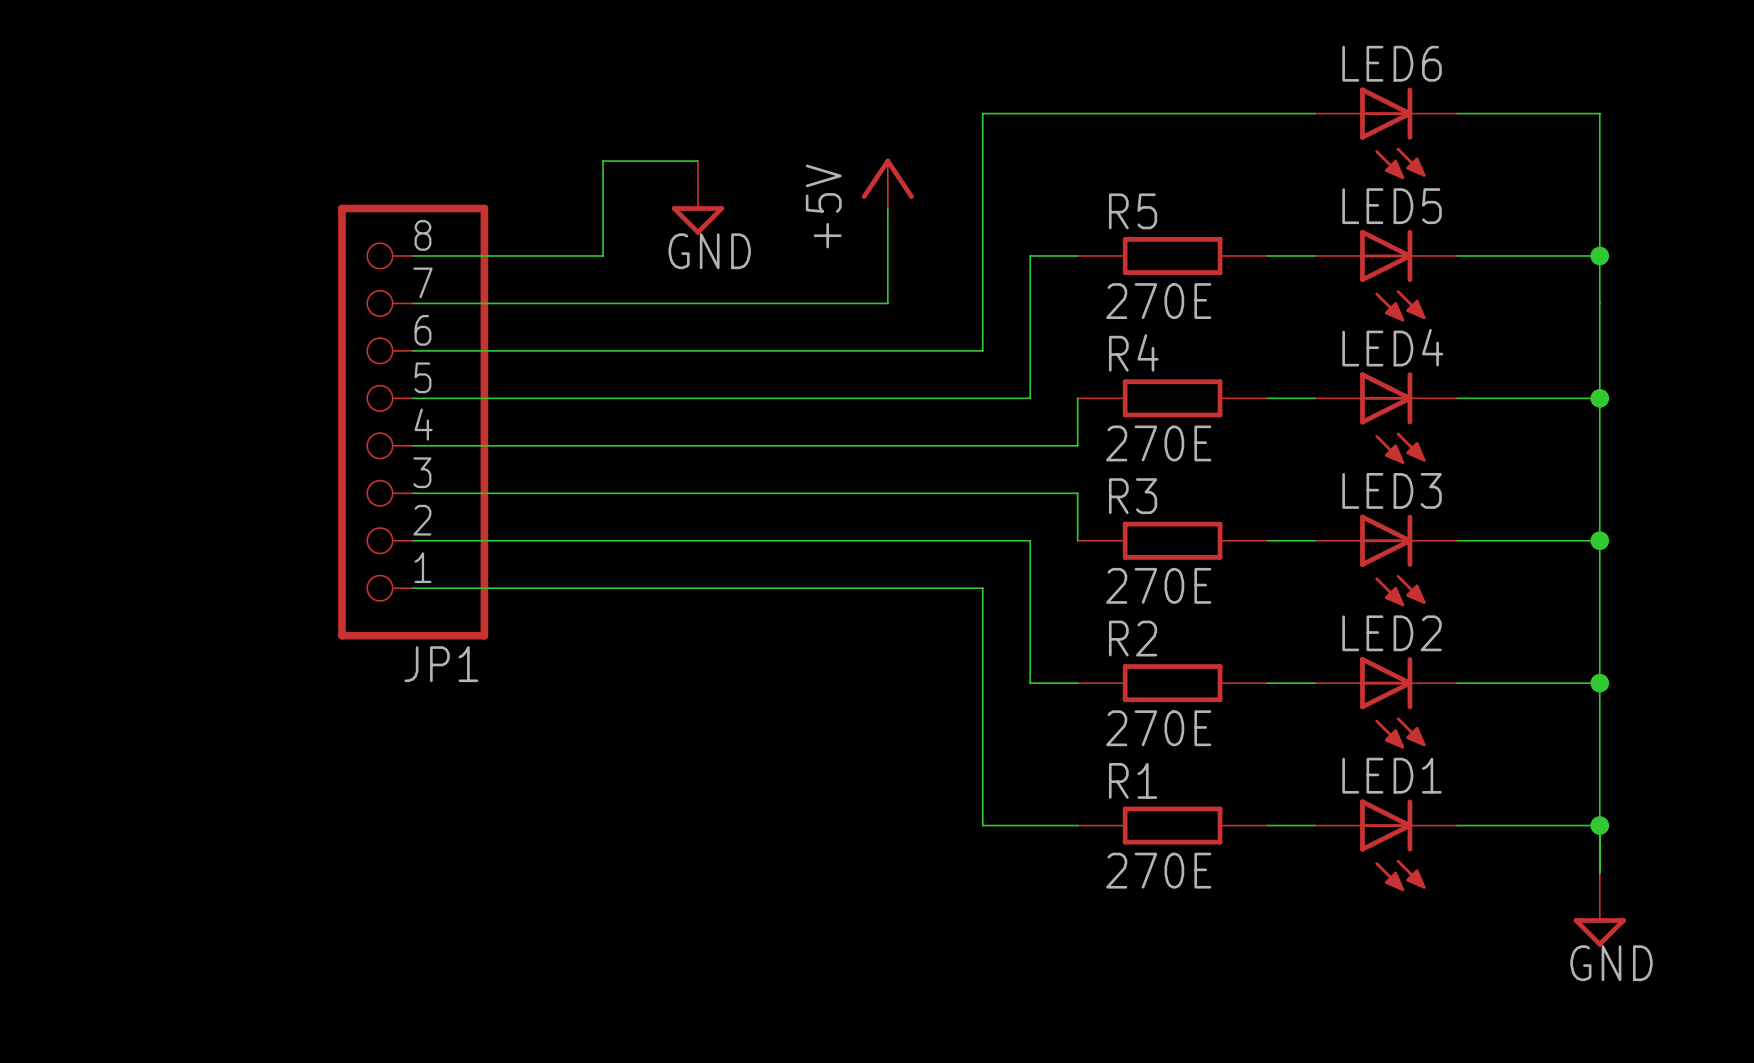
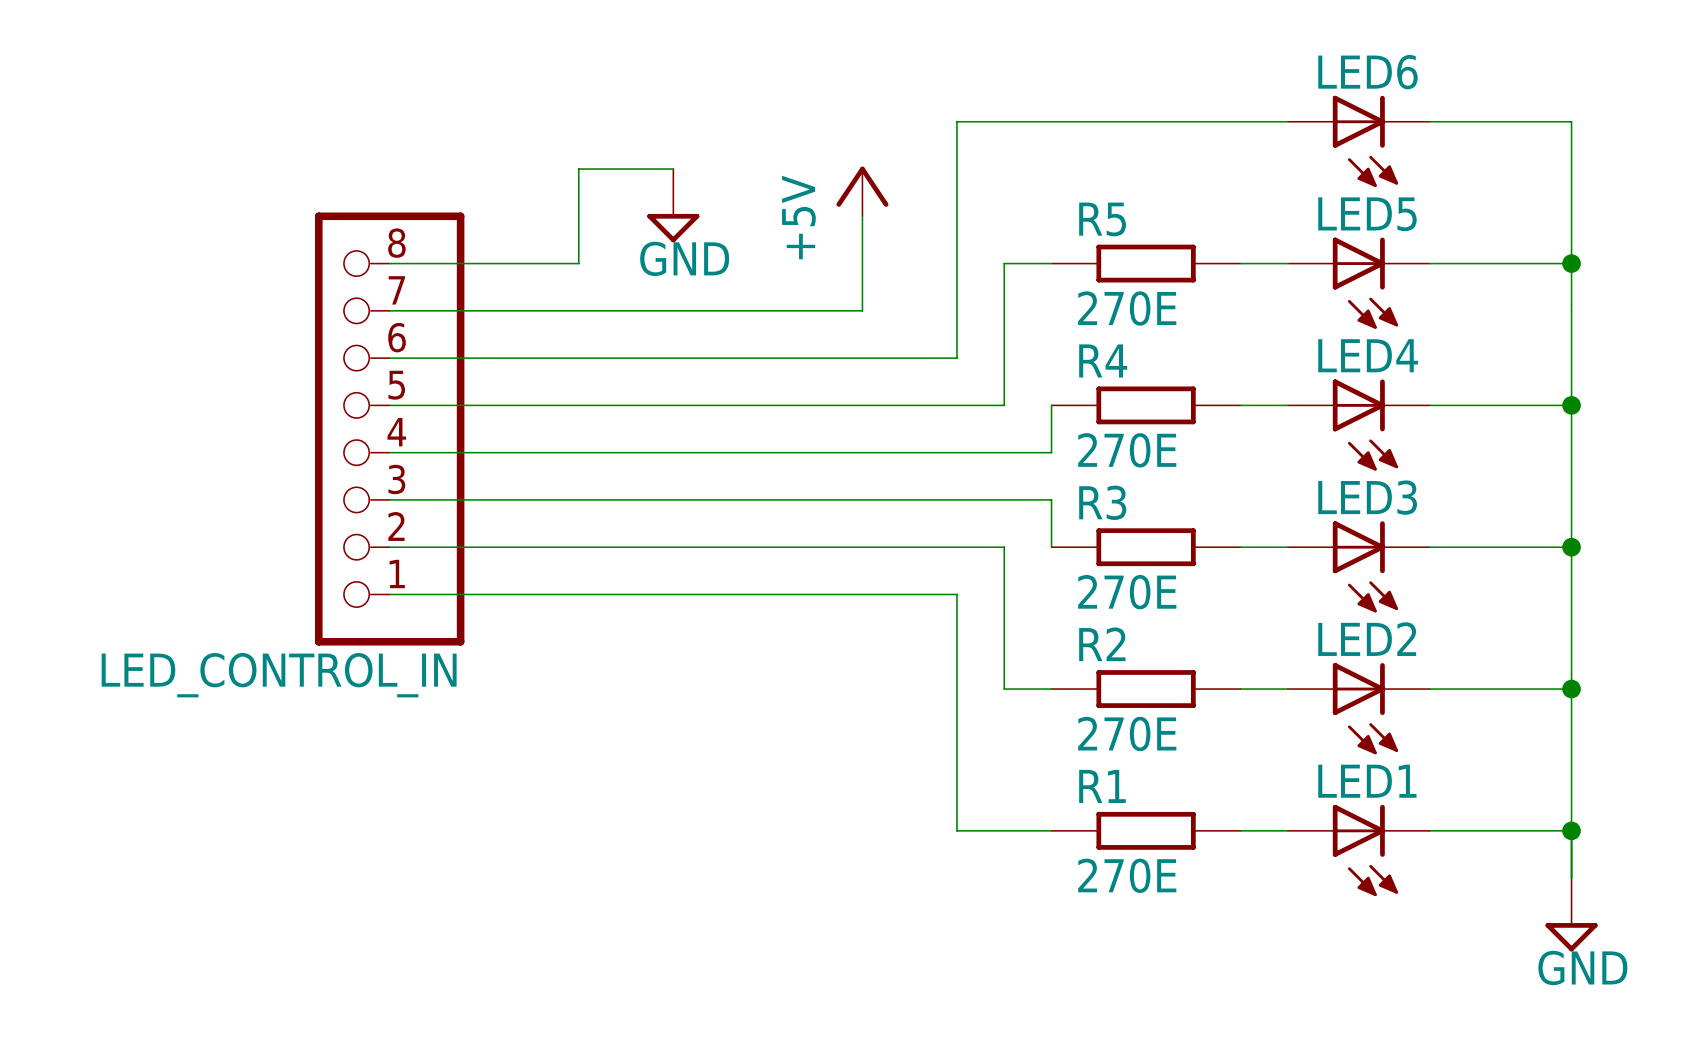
JP1 name: JP1 (441, 664) -> LED_CONTROL_IN (279, 675)

